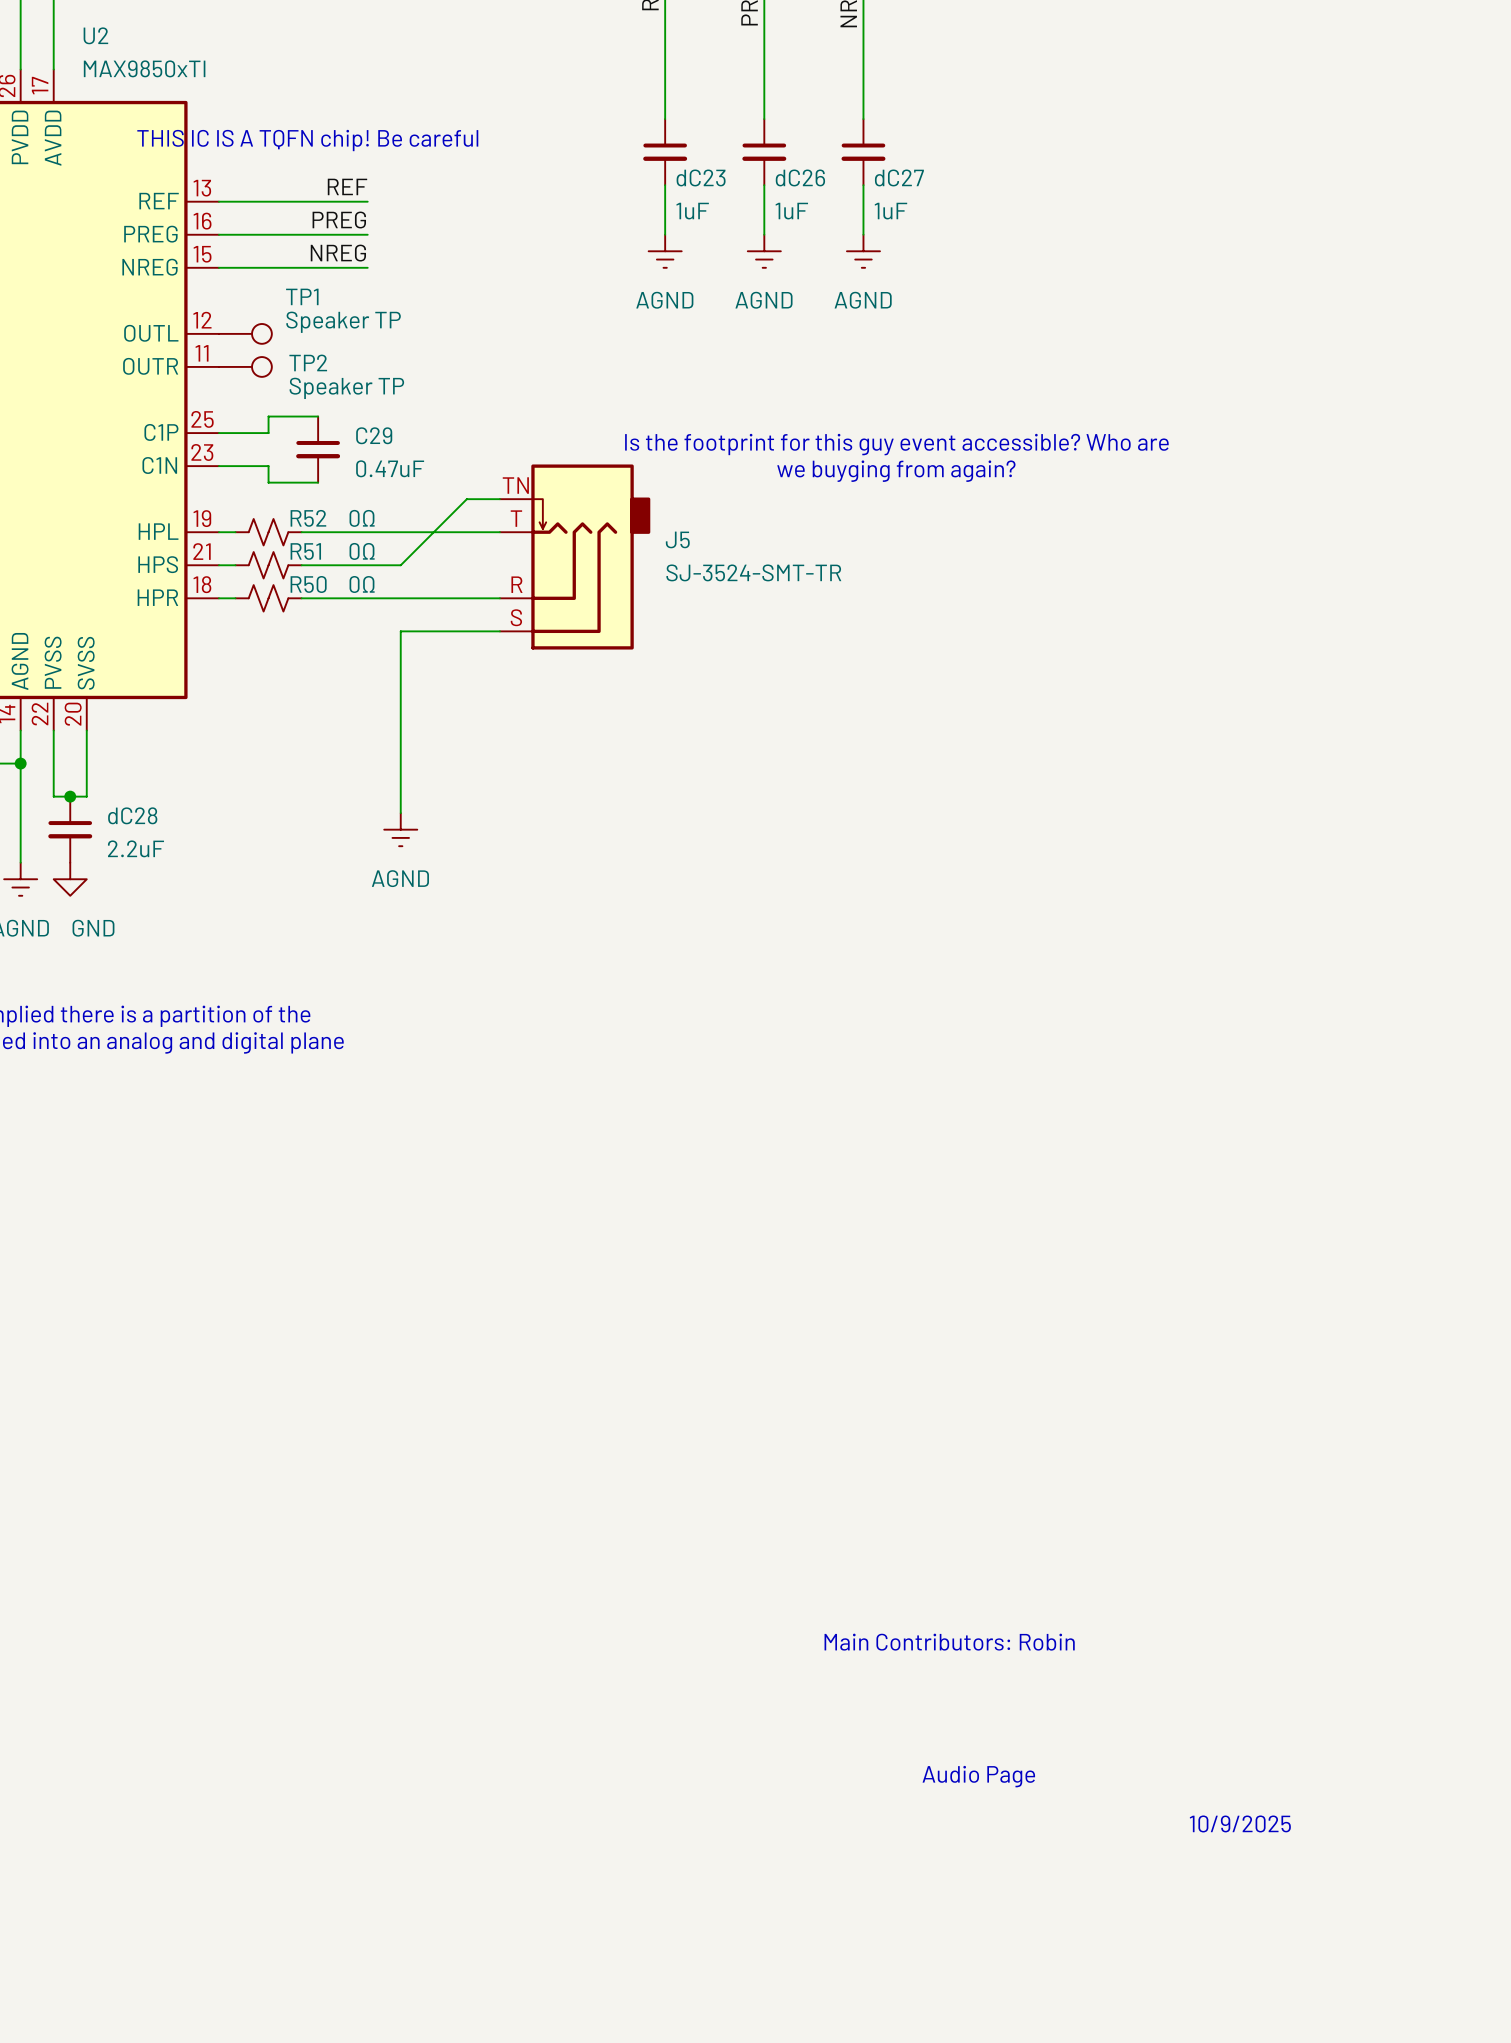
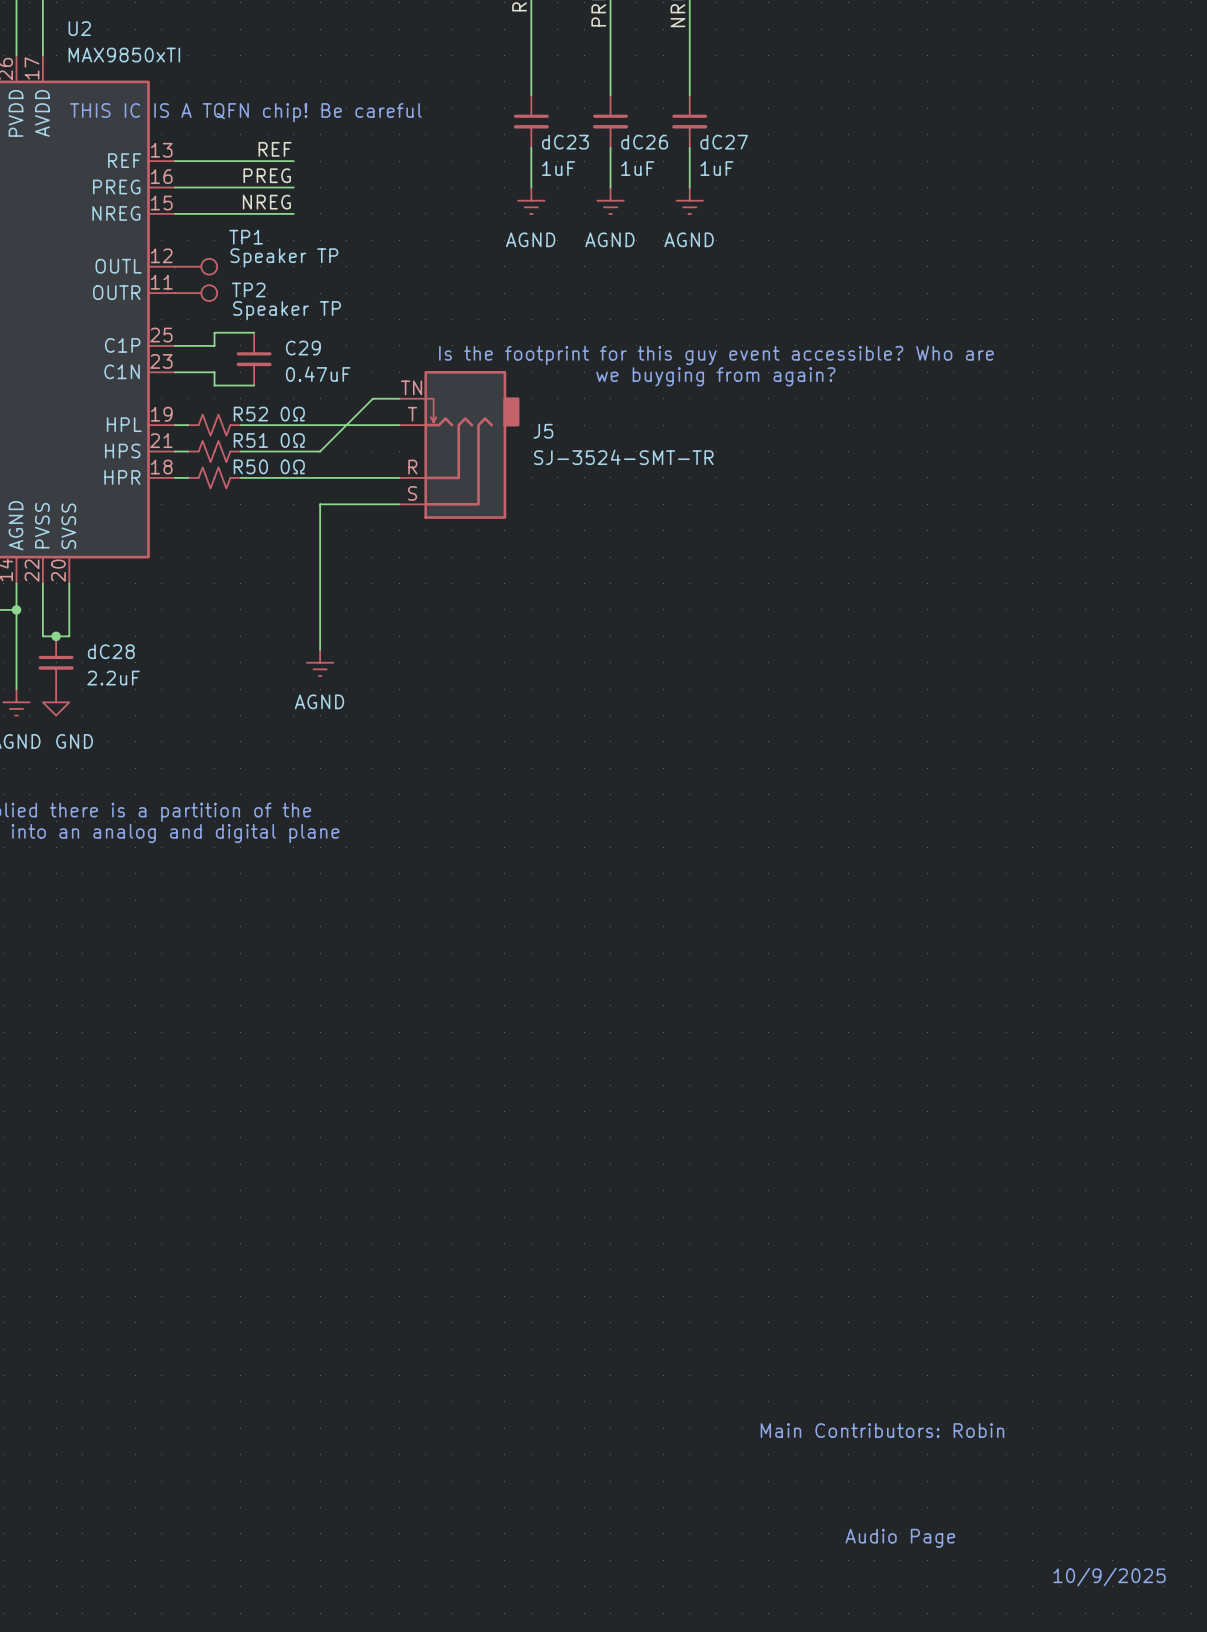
text position: Main Contributors: Robin (949, 1642) -> Main Contributors: Robin (882, 1430)
text position: Audio Page (978, 1776) -> Audio Page (900, 1538)
text position: 10/9/2025 (1240, 1823) -> 10/9/2025 (1109, 1577)

